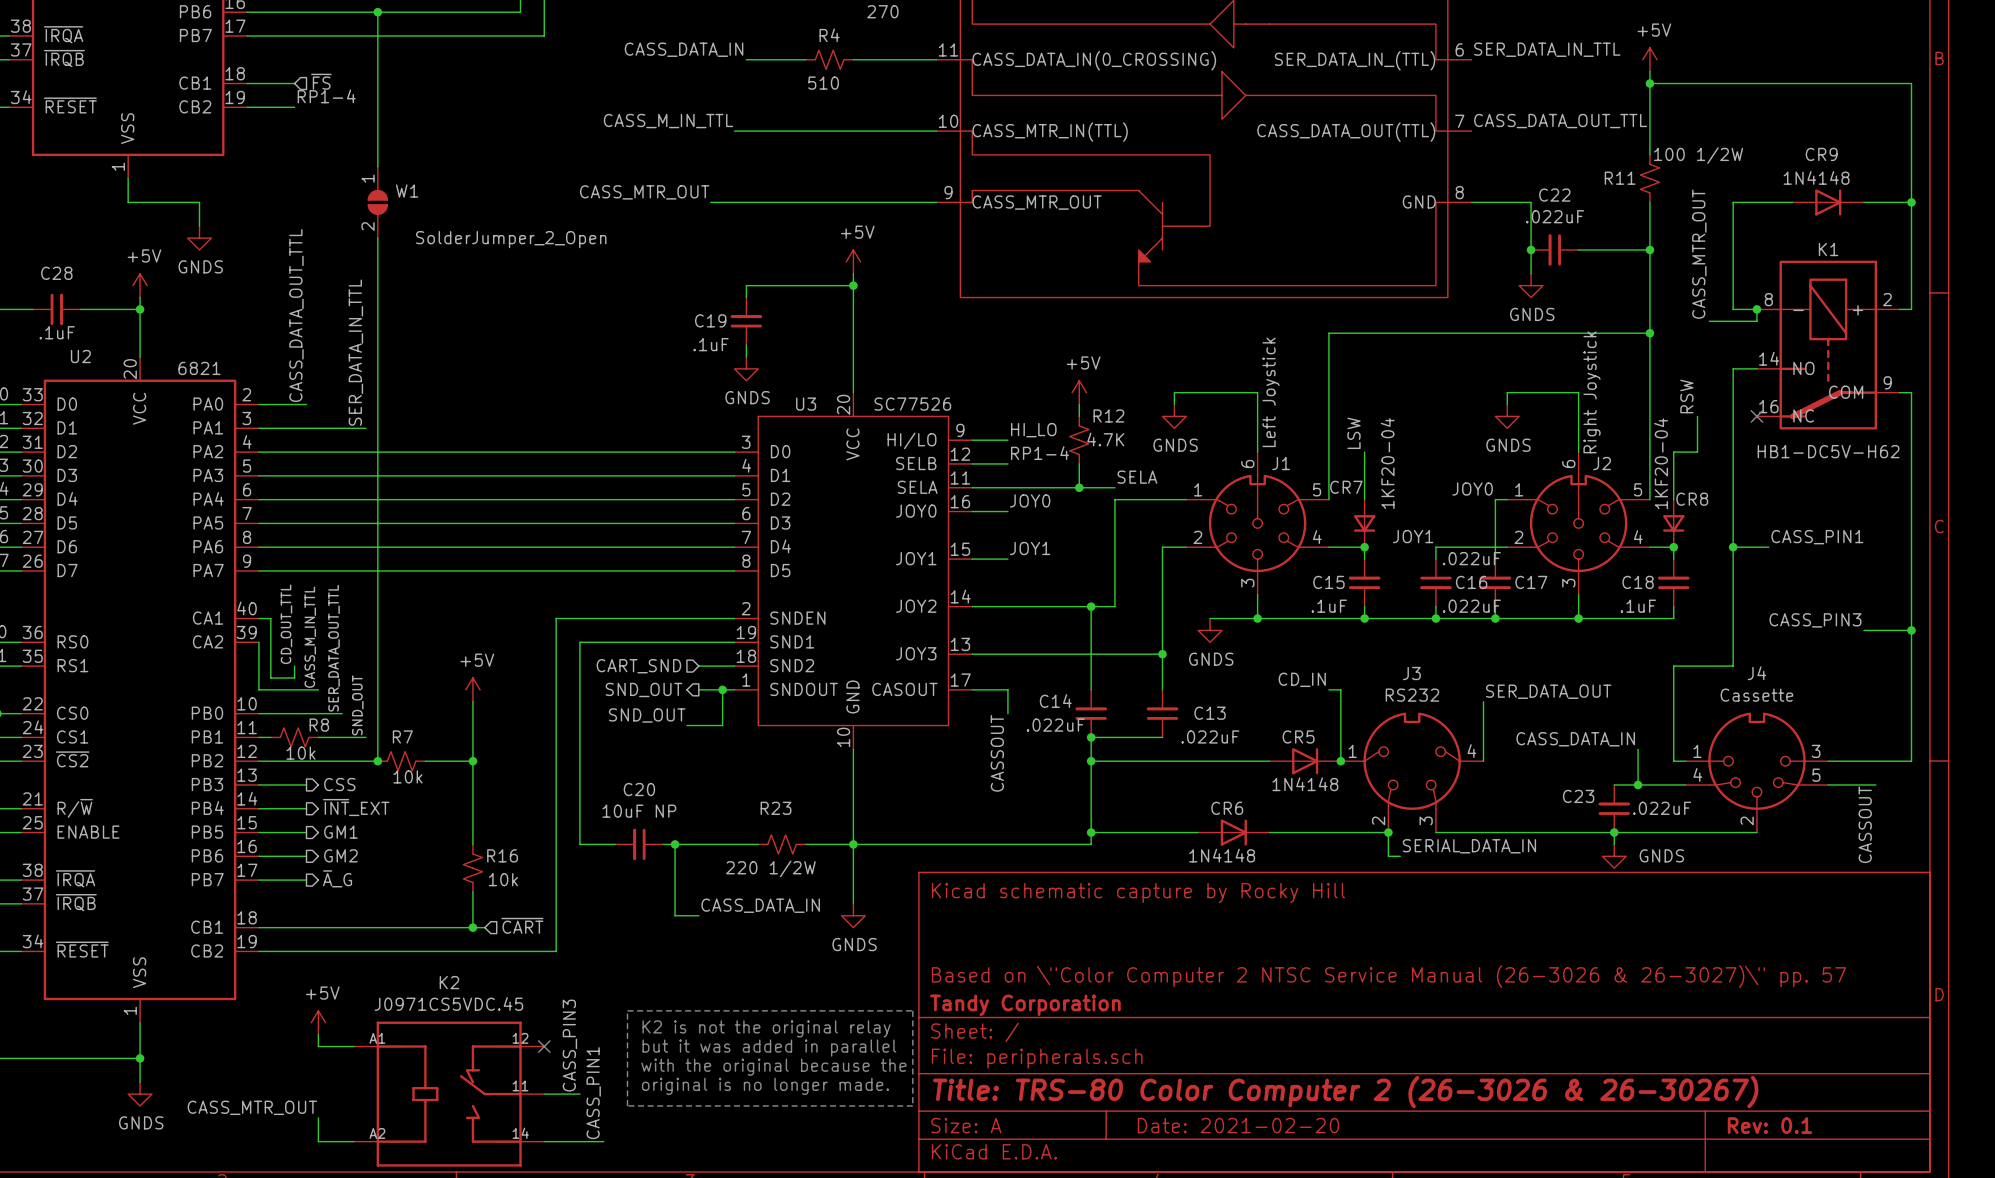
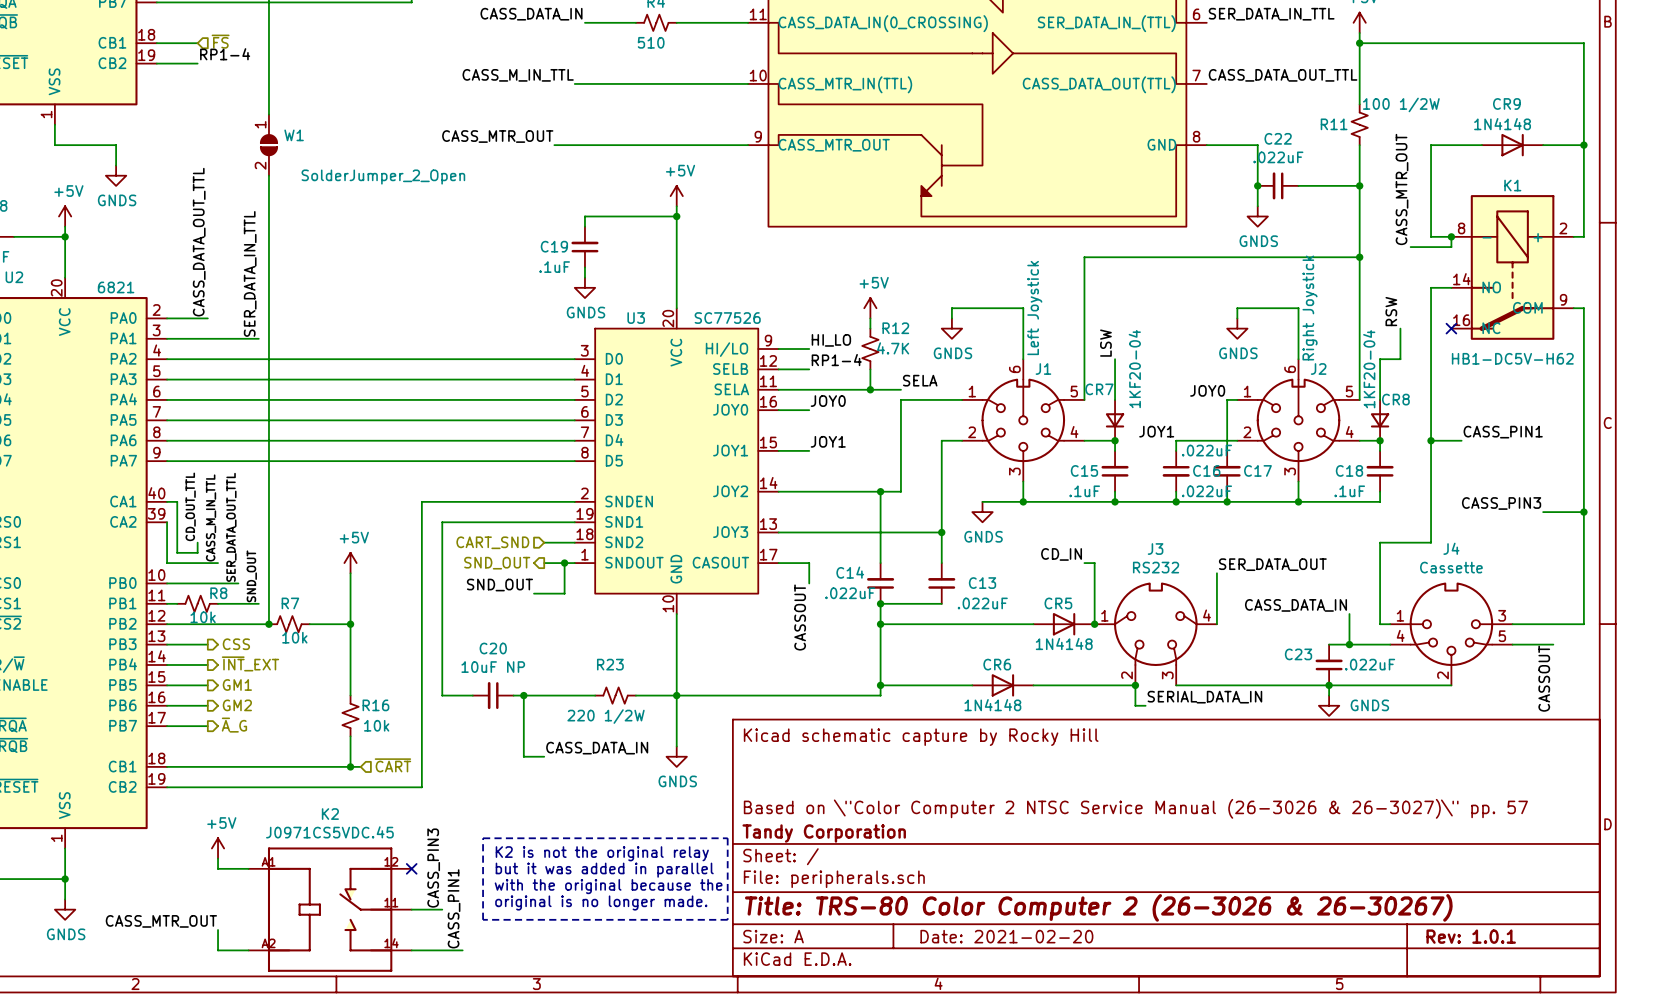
title block: Rev: 0.1 (1769, 1125) -> Rev: 1.0.1 (1471, 936)

